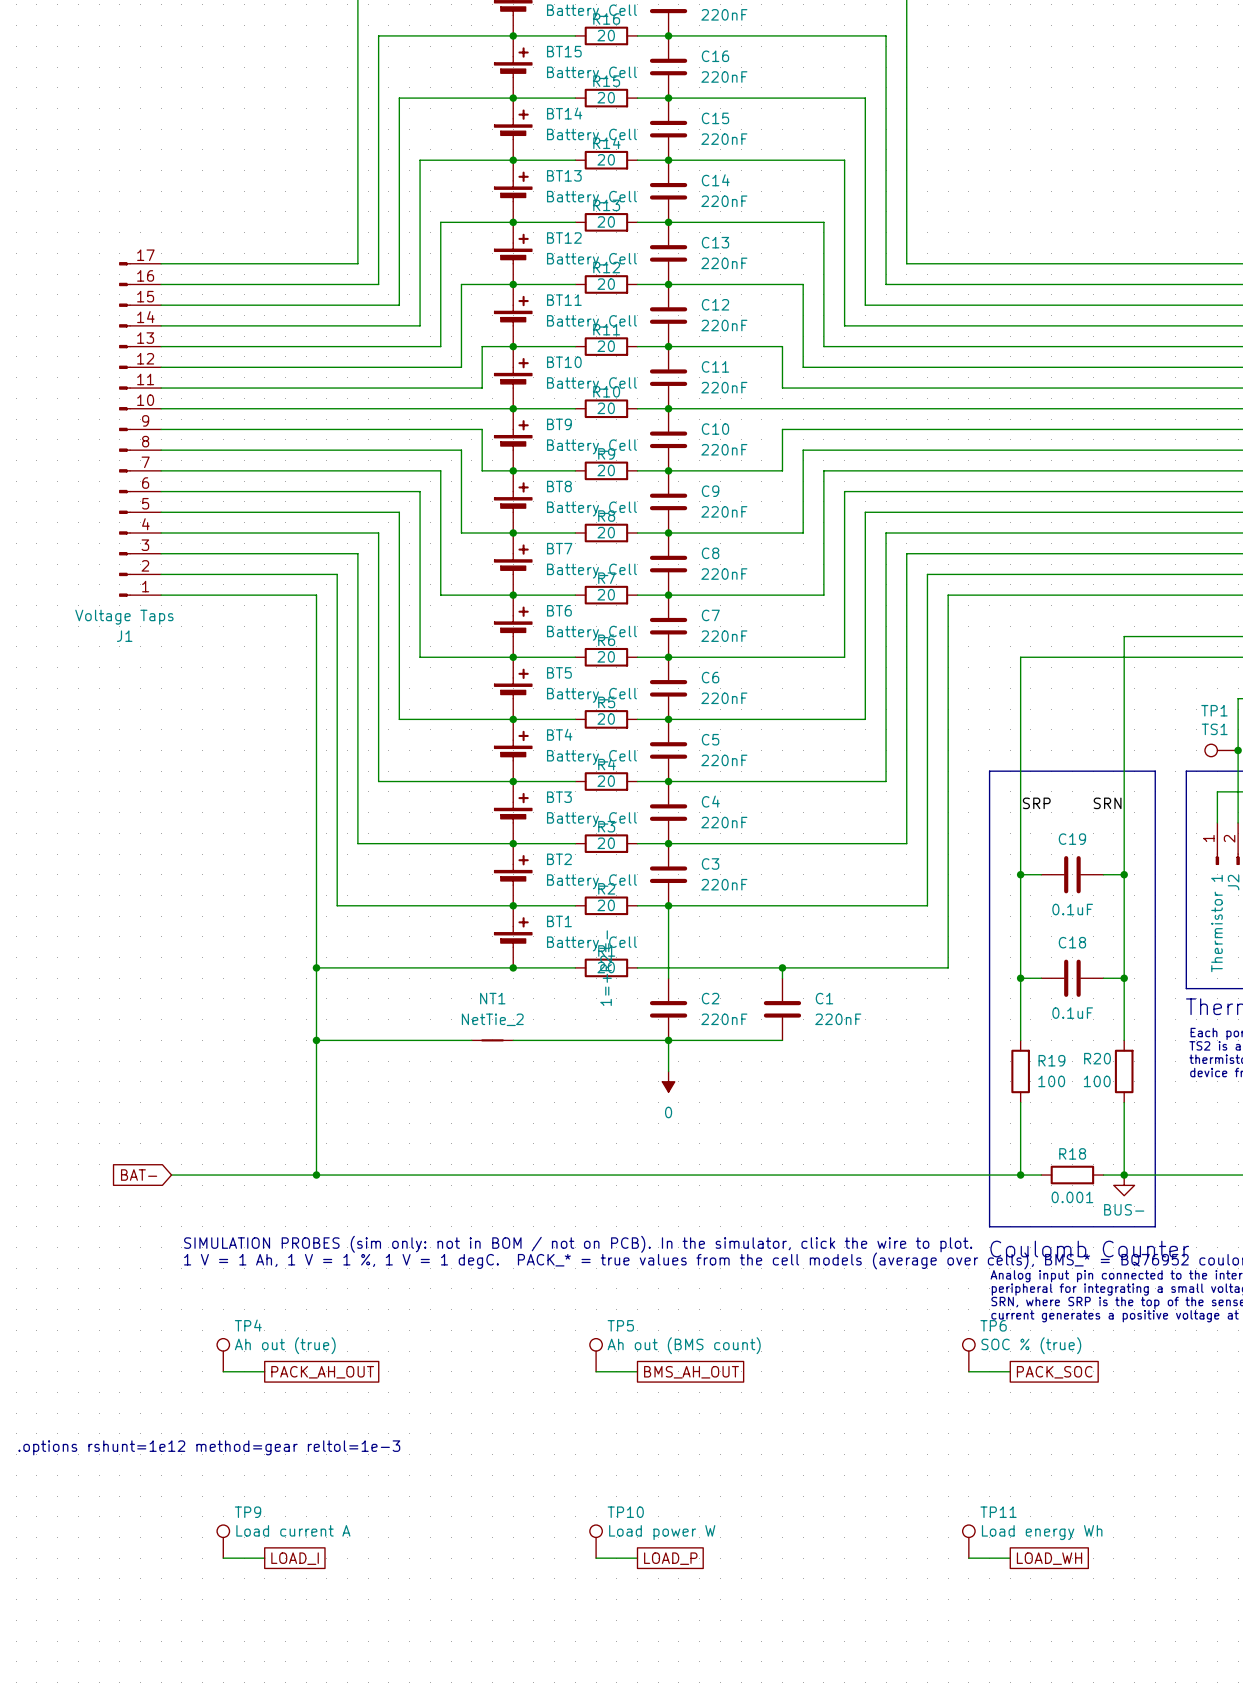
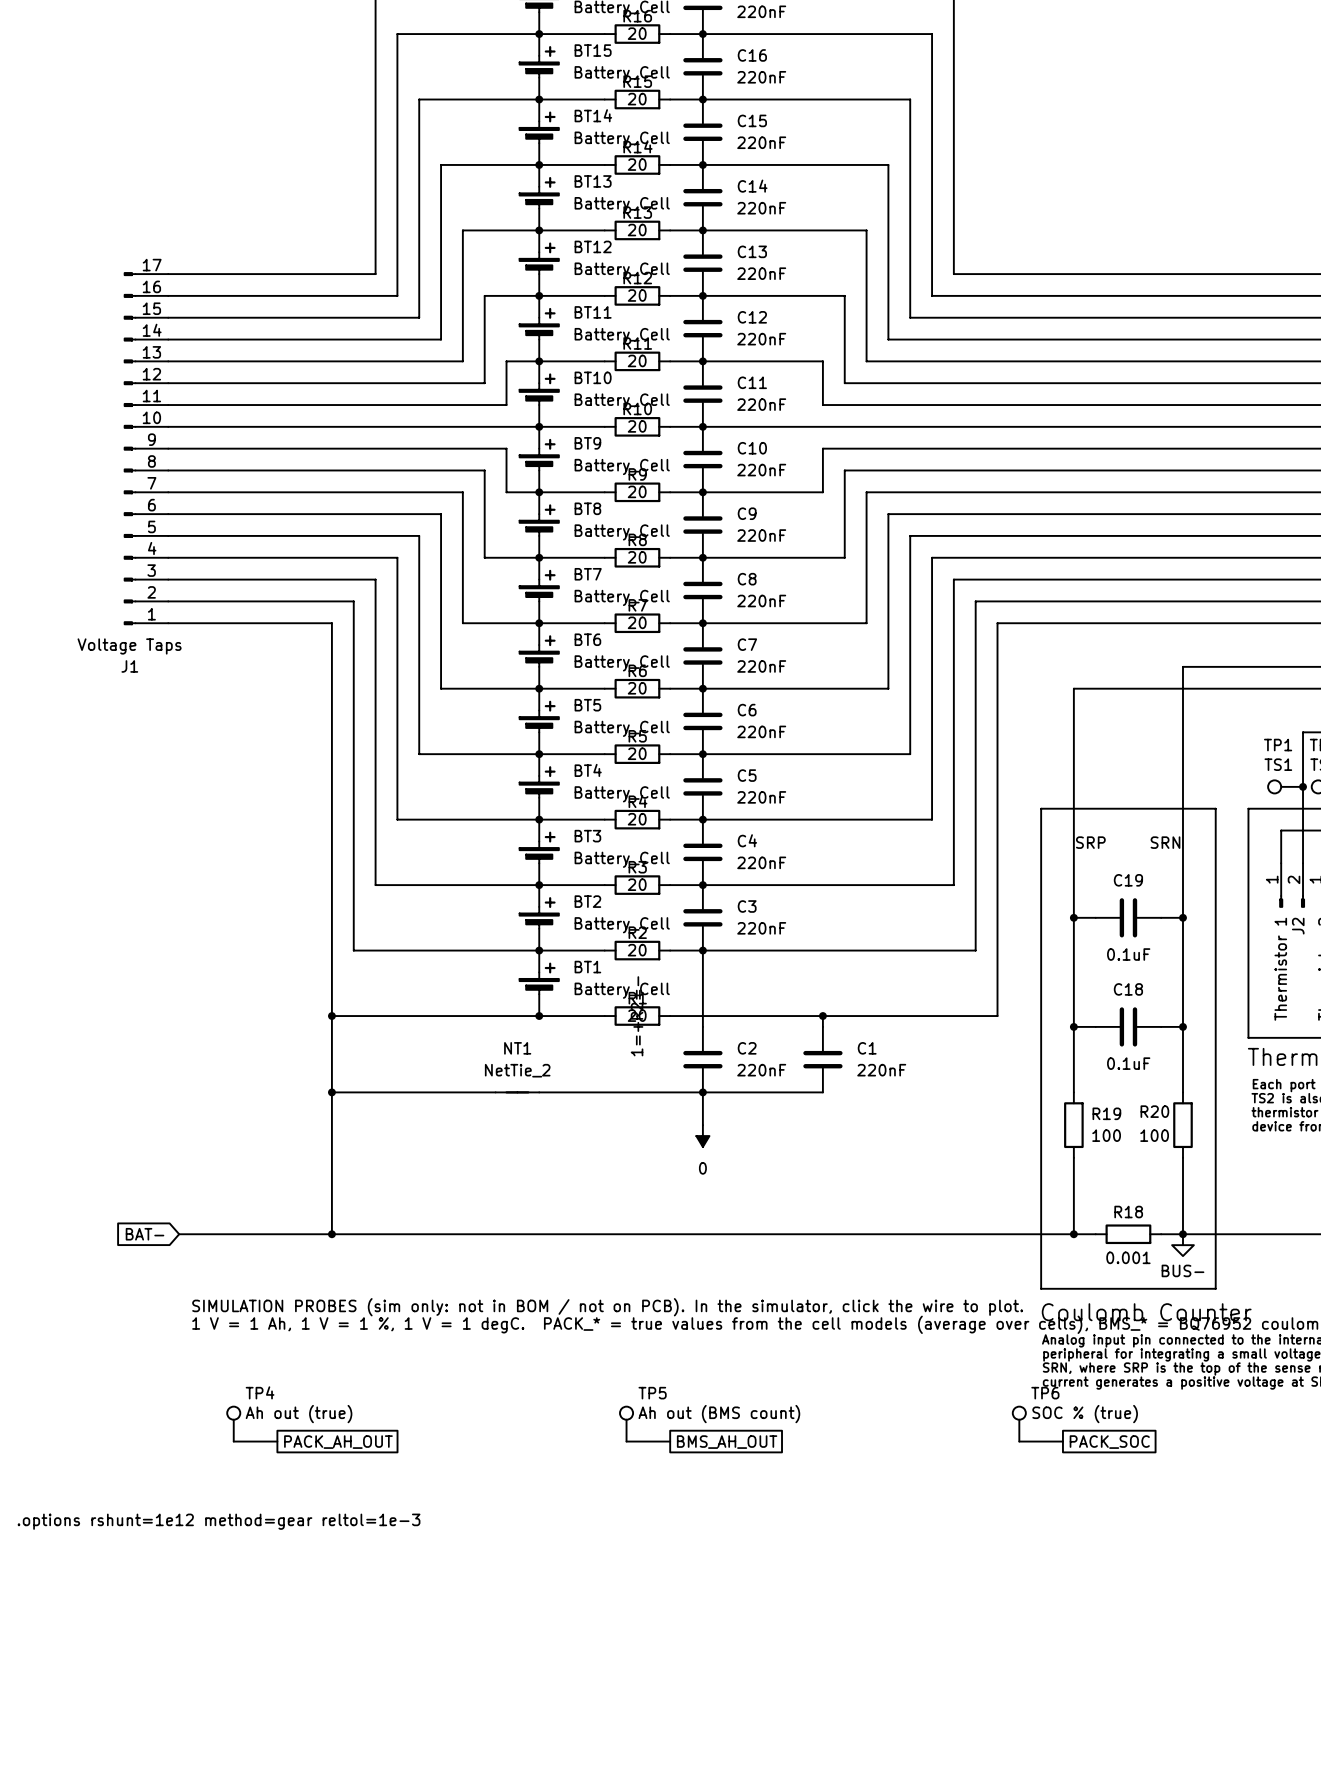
TP9: Load current A (223, 1541) -> none
TP10: Load power W (596, 1541) -> none
TP11: Load energy Wh (968, 1541) -> none
wire: (223, 1558) (264, 1558) -> none
global label: LOAD_I (295, 1558) -> none
wire: (596, 1558) (637, 1558) -> none
global label: LOAD_P (670, 1558) -> none
wire: (968, 1558) (1010, 1558) -> none
global label: LOAD_WH (1049, 1558) -> none

